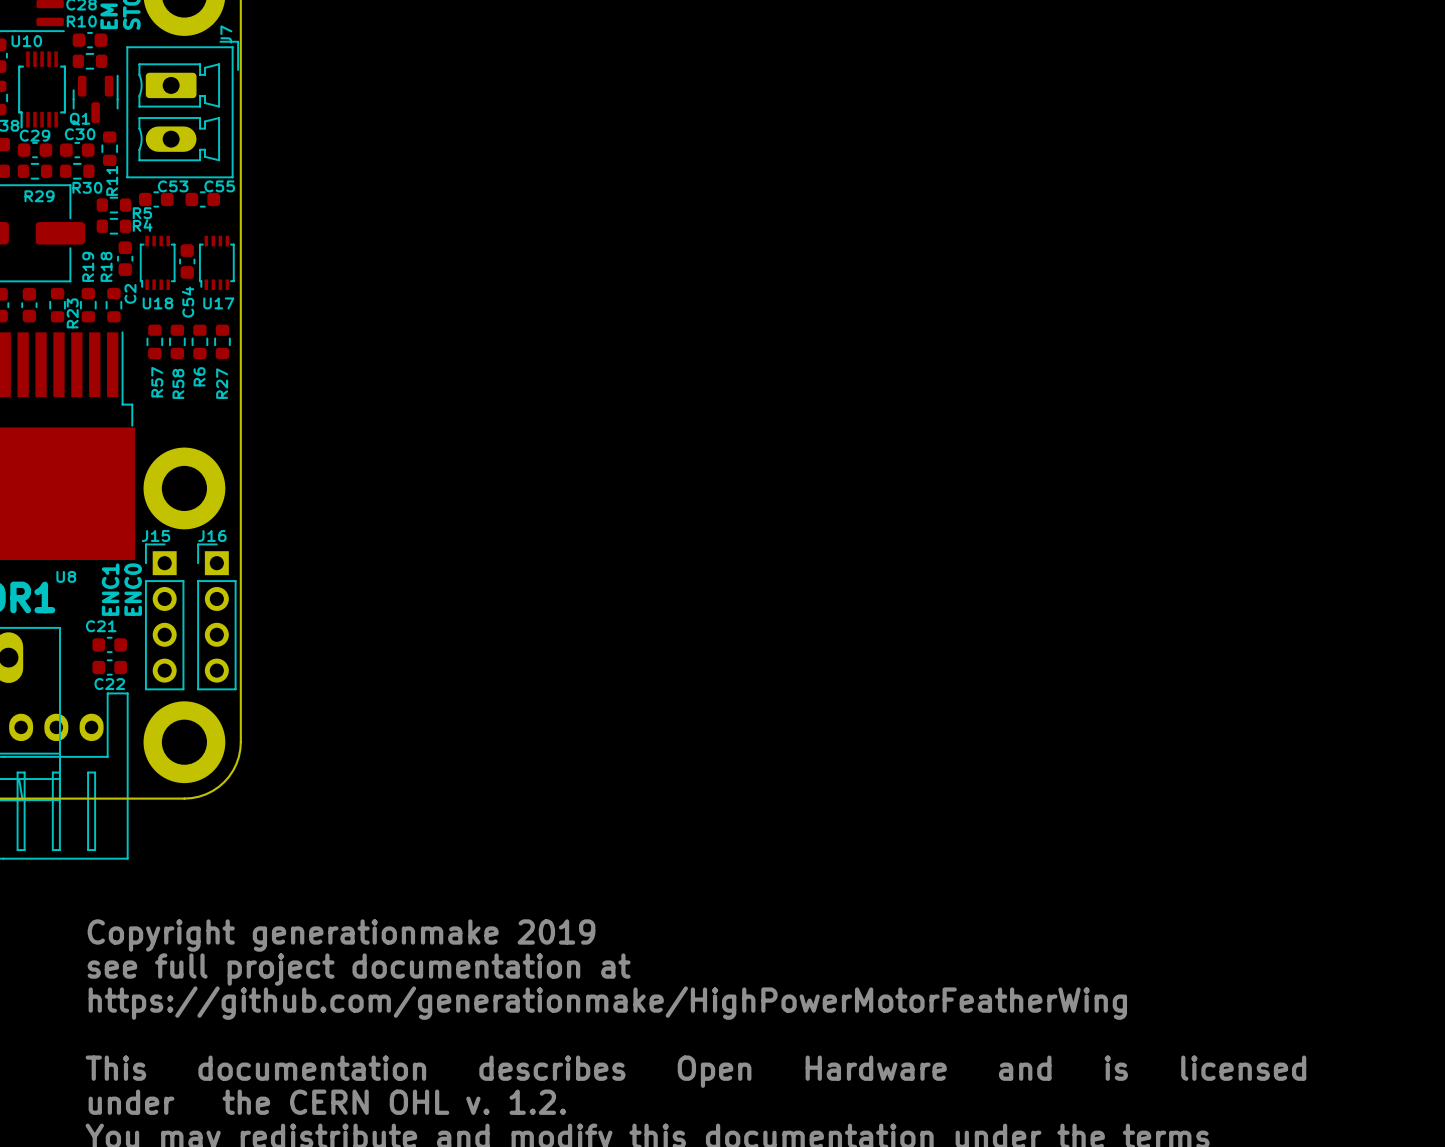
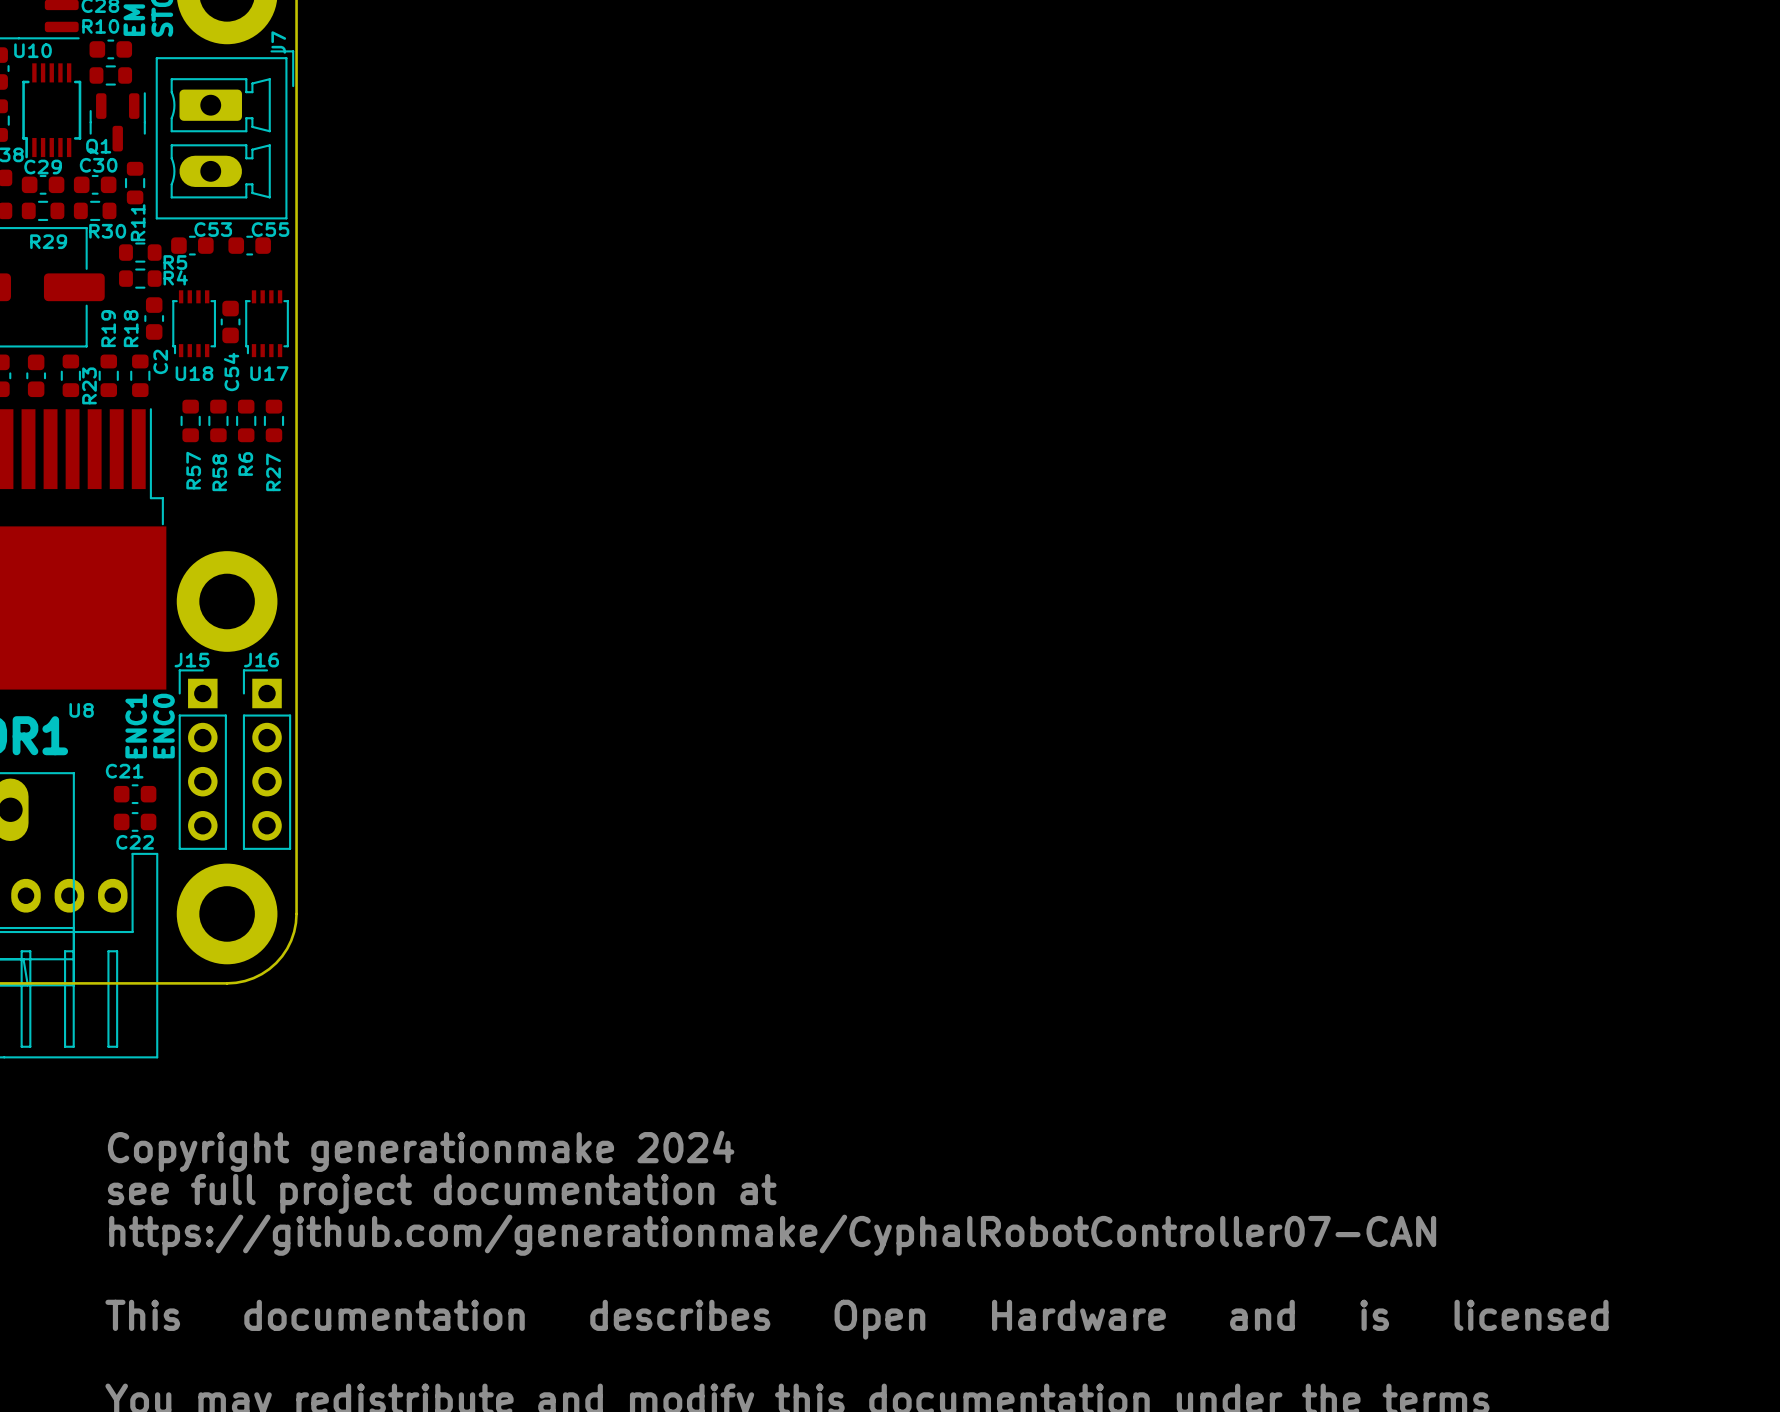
text: Copyright generationmake 2019 (341, 935) -> Copyright generationmake 2024 (421, 1151)
text: https://github.com/generationmake/HighPowerMotorFeatherWing (607, 1003) -> https://github.com/generationmake/CyphalRobotController07-CAN (772, 1235)
text: under the CERN OHL v. 1.2. (327, 1102) -> none

